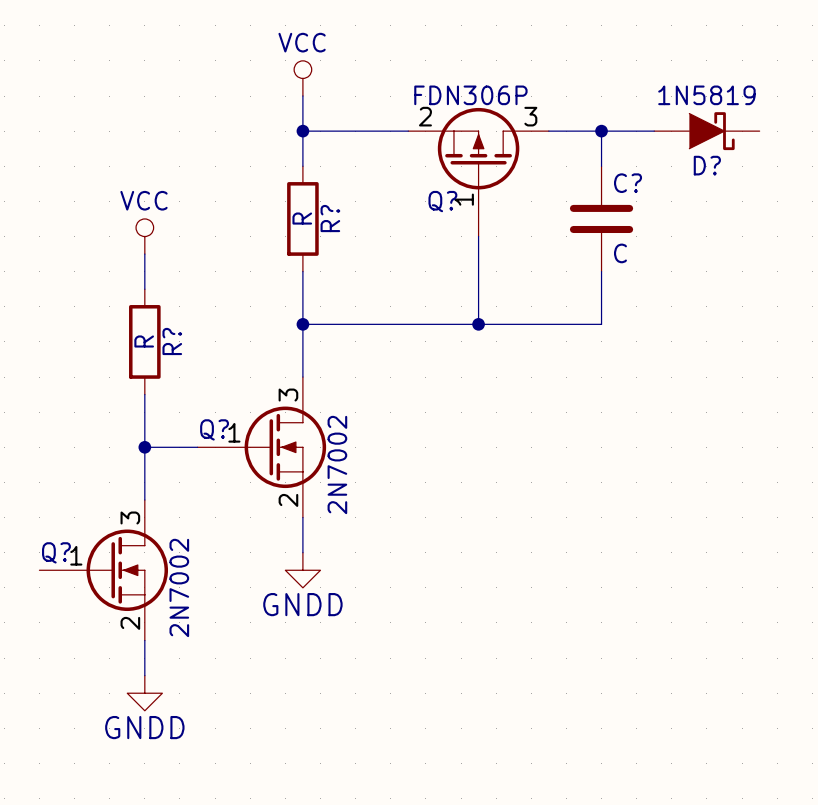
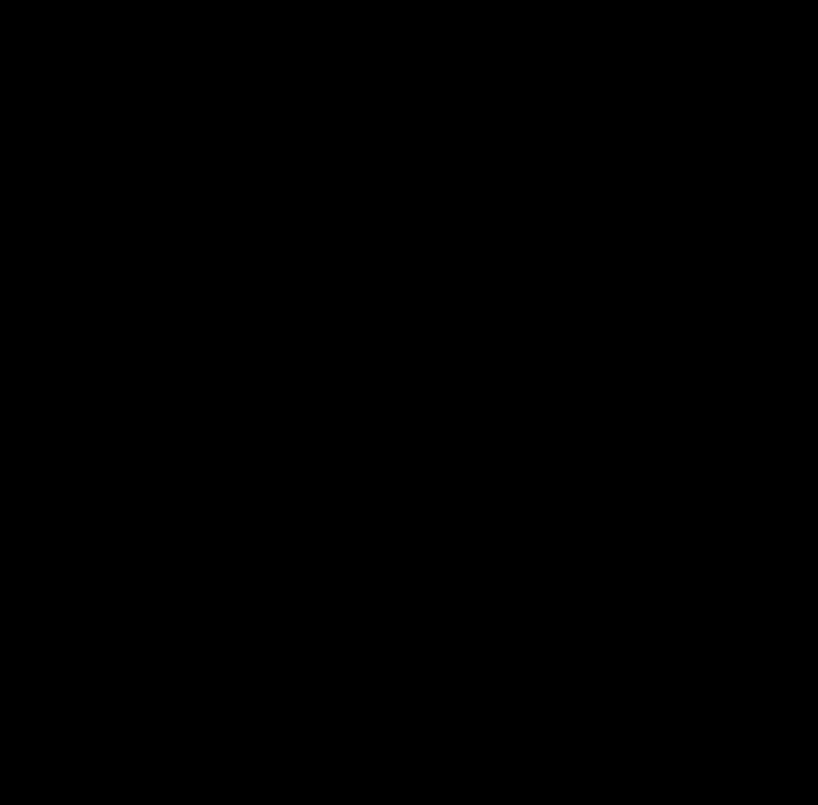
power symbol: VCC (302, 78) -> none
wire: (302, 96) (302, 166) -> none
wire: (302, 131) (408, 131) -> none
junction: (302, 131) -> none
wire: (548, 131) (654, 131) -> none
wire: (601, 131) (601, 166) -> none
junction: (601, 131) -> none
D?: 1N5819 (706, 131) -> none
Q?: FDN306P (478, 172) -> none
R?: R (302, 218) -> none
C?: C (601, 218) -> none
power symbol: VCC (144, 236) -> none
wire: (478, 236) (478, 324) -> none
wire: (144, 254) (144, 289) -> none
wire: (302, 271) (302, 377) -> none
wire: (601, 271) (601, 324) (302, 324) -> none
junction: (302, 324) -> none
junction: (478, 324) -> none
R?: R (144, 341) -> none
wire: (144, 394) (144, 500) -> none
wire: (144, 447) (197, 447) -> none
junction: (144, 447) -> none
Q?: 2N7002 (261, 447) -> none
wire: (302, 517) (302, 552) -> none
Q?: 2N7002 (103, 570) -> none
power symbol: GNDD (302, 570) -> none
wire: (144, 640) (144, 675) -> none
power symbol: GNDD (144, 693) -> none

